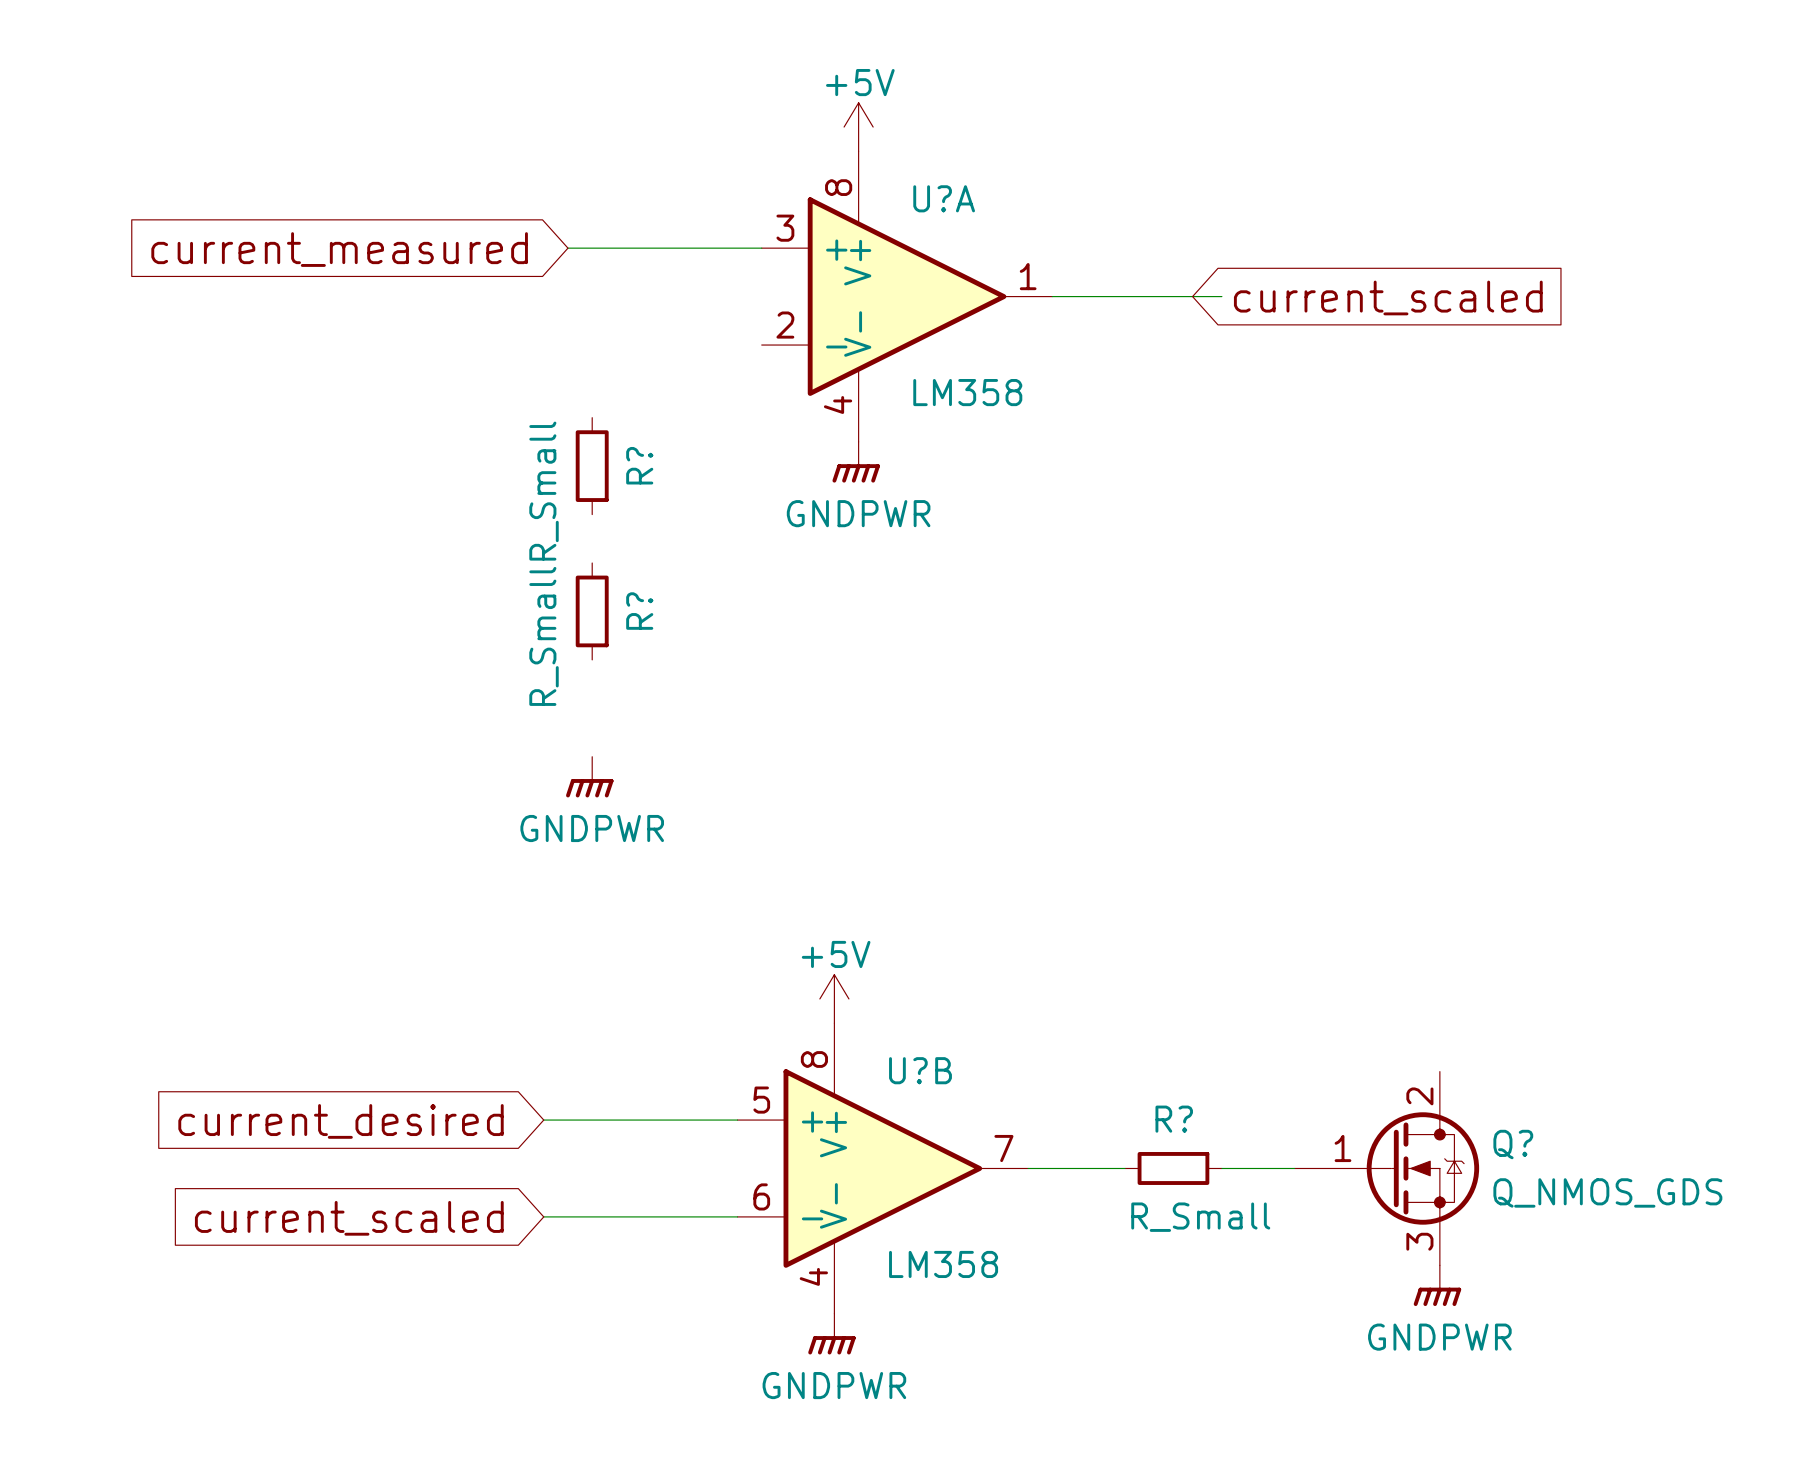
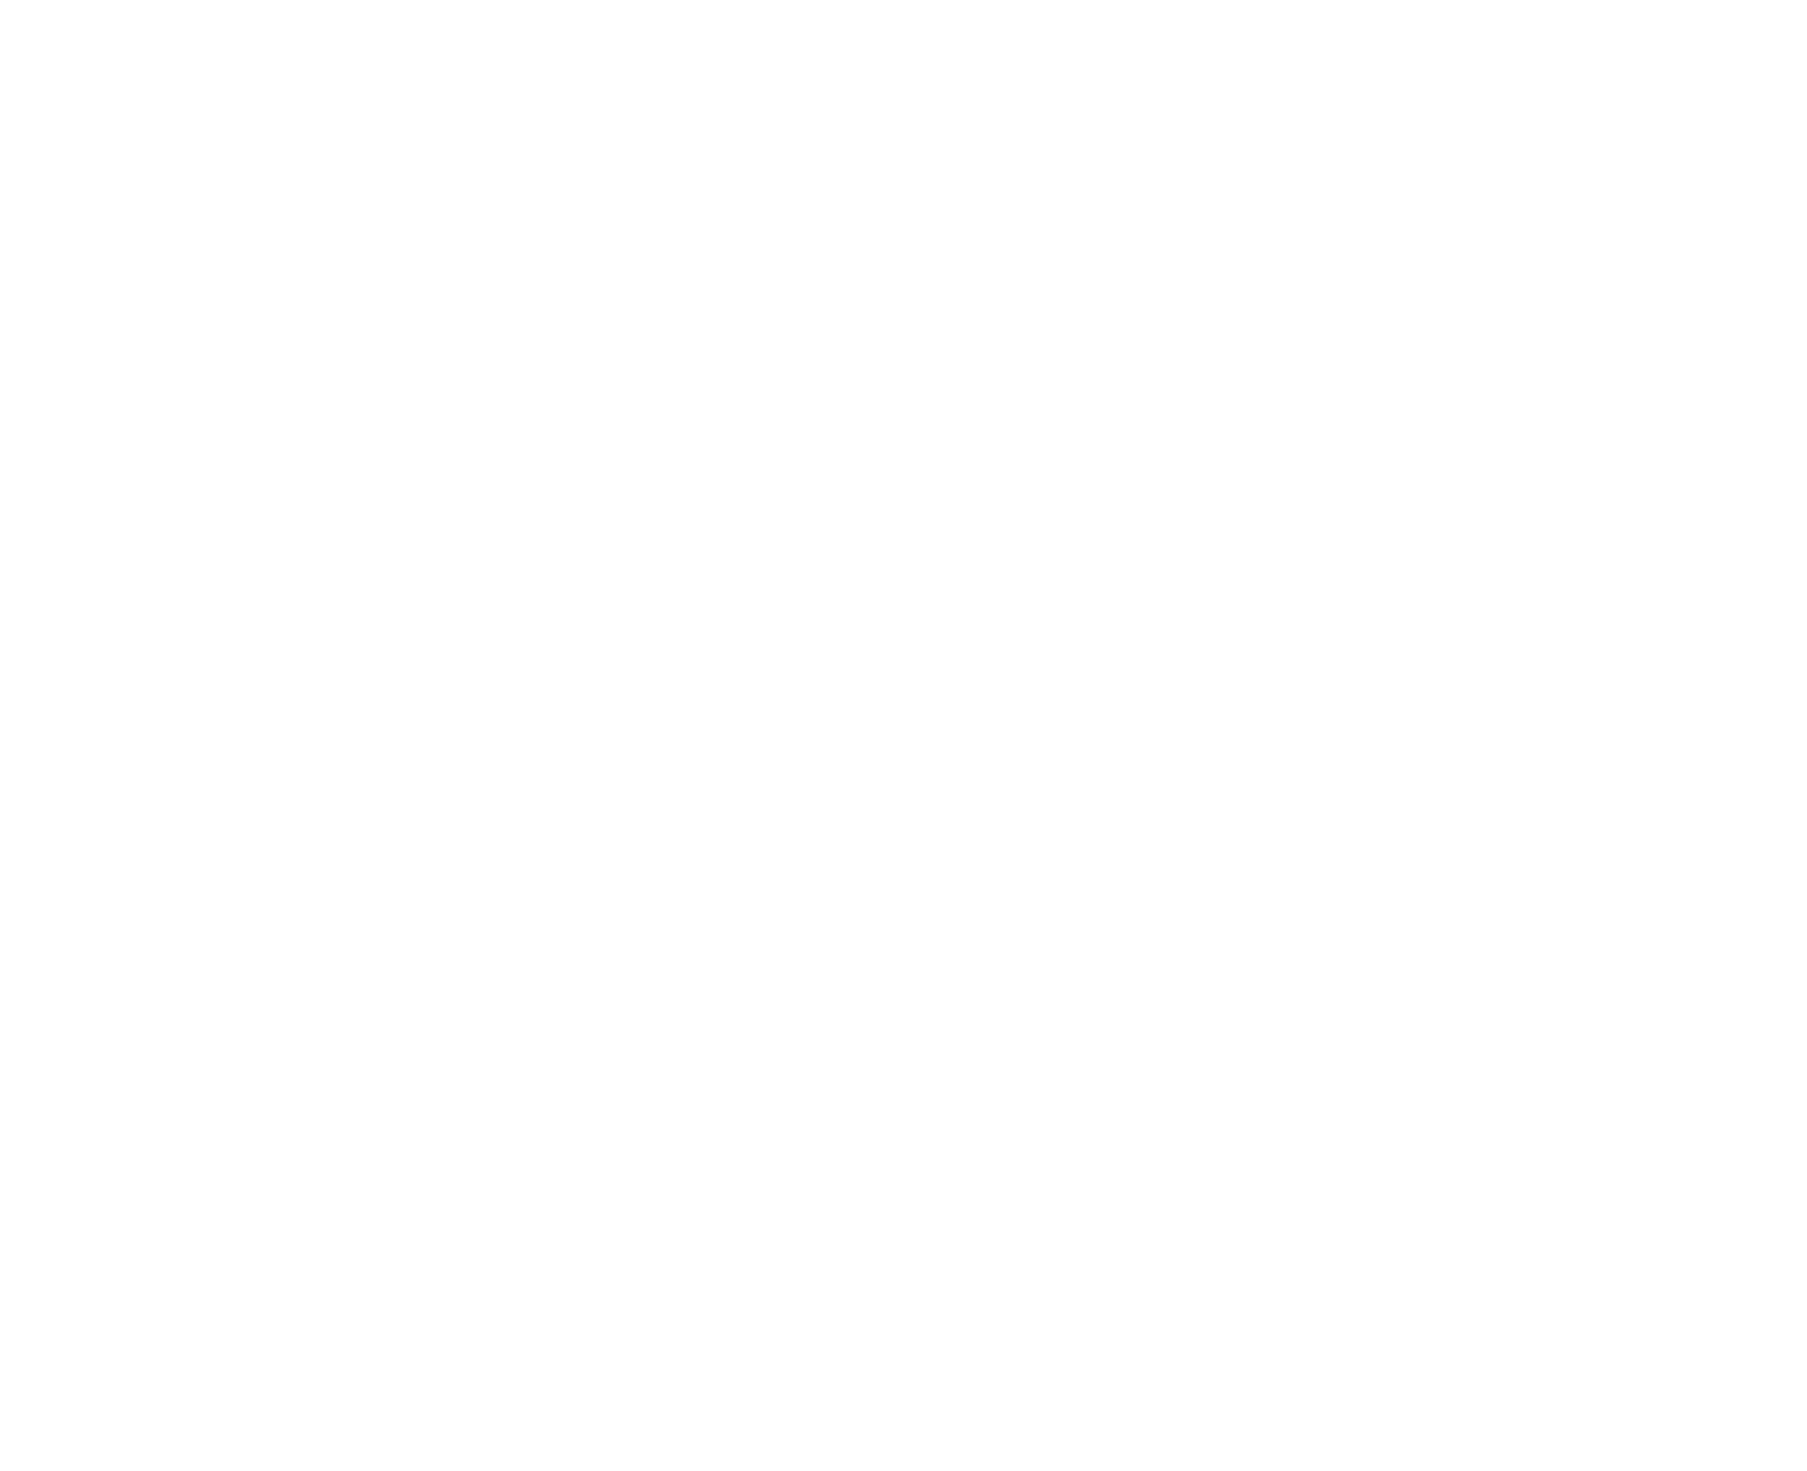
power symbol: +5V (858, 127) -> none
wire: (567, 248) (761, 248) -> none
global label: current_measured (339, 249) -> none
U?A: LM358 (907, 296) -> none
wire: (1052, 296) (1221, 296) -> none
global label: current_scaled (1388, 297) -> none
power symbol: GNDPWR (856, 462) -> none
R?: R_Small (592, 466) -> none
R?: R_Small (592, 611) -> none
power symbol: GNDPWR (589, 777) -> none
power symbol: +5V (834, 998) -> none
wire: (543, 1120) (737, 1120) -> none
global label: current_desired (341, 1121) -> none
U?B: LM358 (882, 1168) -> none
wire: (1028, 1168) (1125, 1168) -> none
R?: R_Small (1173, 1168) -> none
wire: (1221, 1168) (1294, 1168) -> none
Q?: Q_NMOS_GDS (1386, 1168) -> none
wire: (543, 1216) (737, 1216) -> none
global label: current_scaled (349, 1218) -> none
power symbol: GNDPWR (1437, 1285) -> none
power symbol: GNDPWR (831, 1334) -> none

